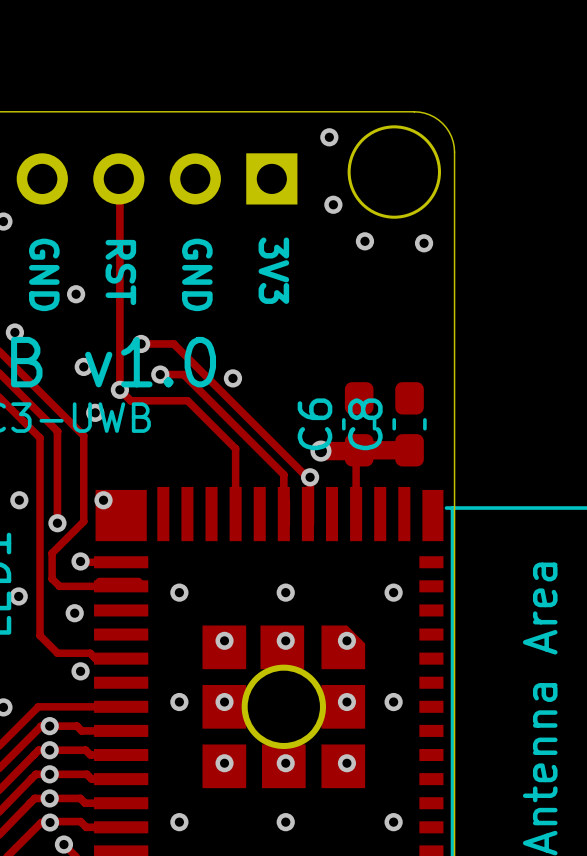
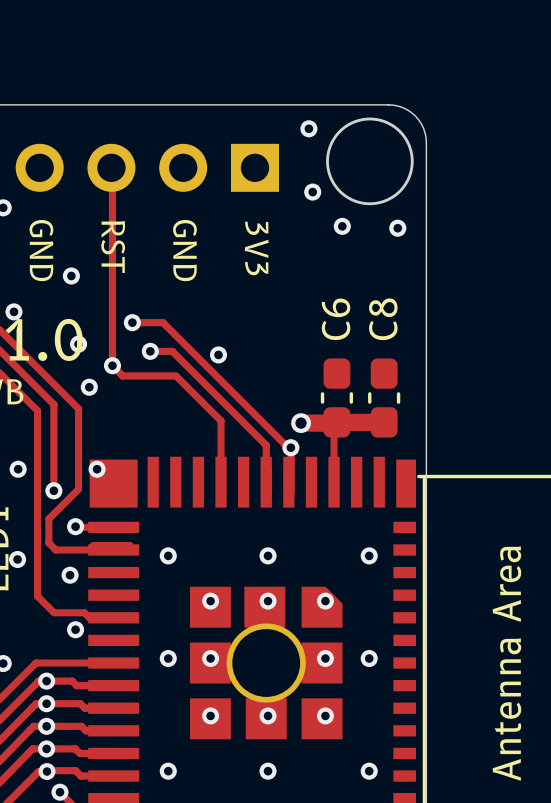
C6 name position: C6 (314, 424) -> C6 (336, 319)
C8 name position: C8 (365, 424) -> C8 (383, 319)

